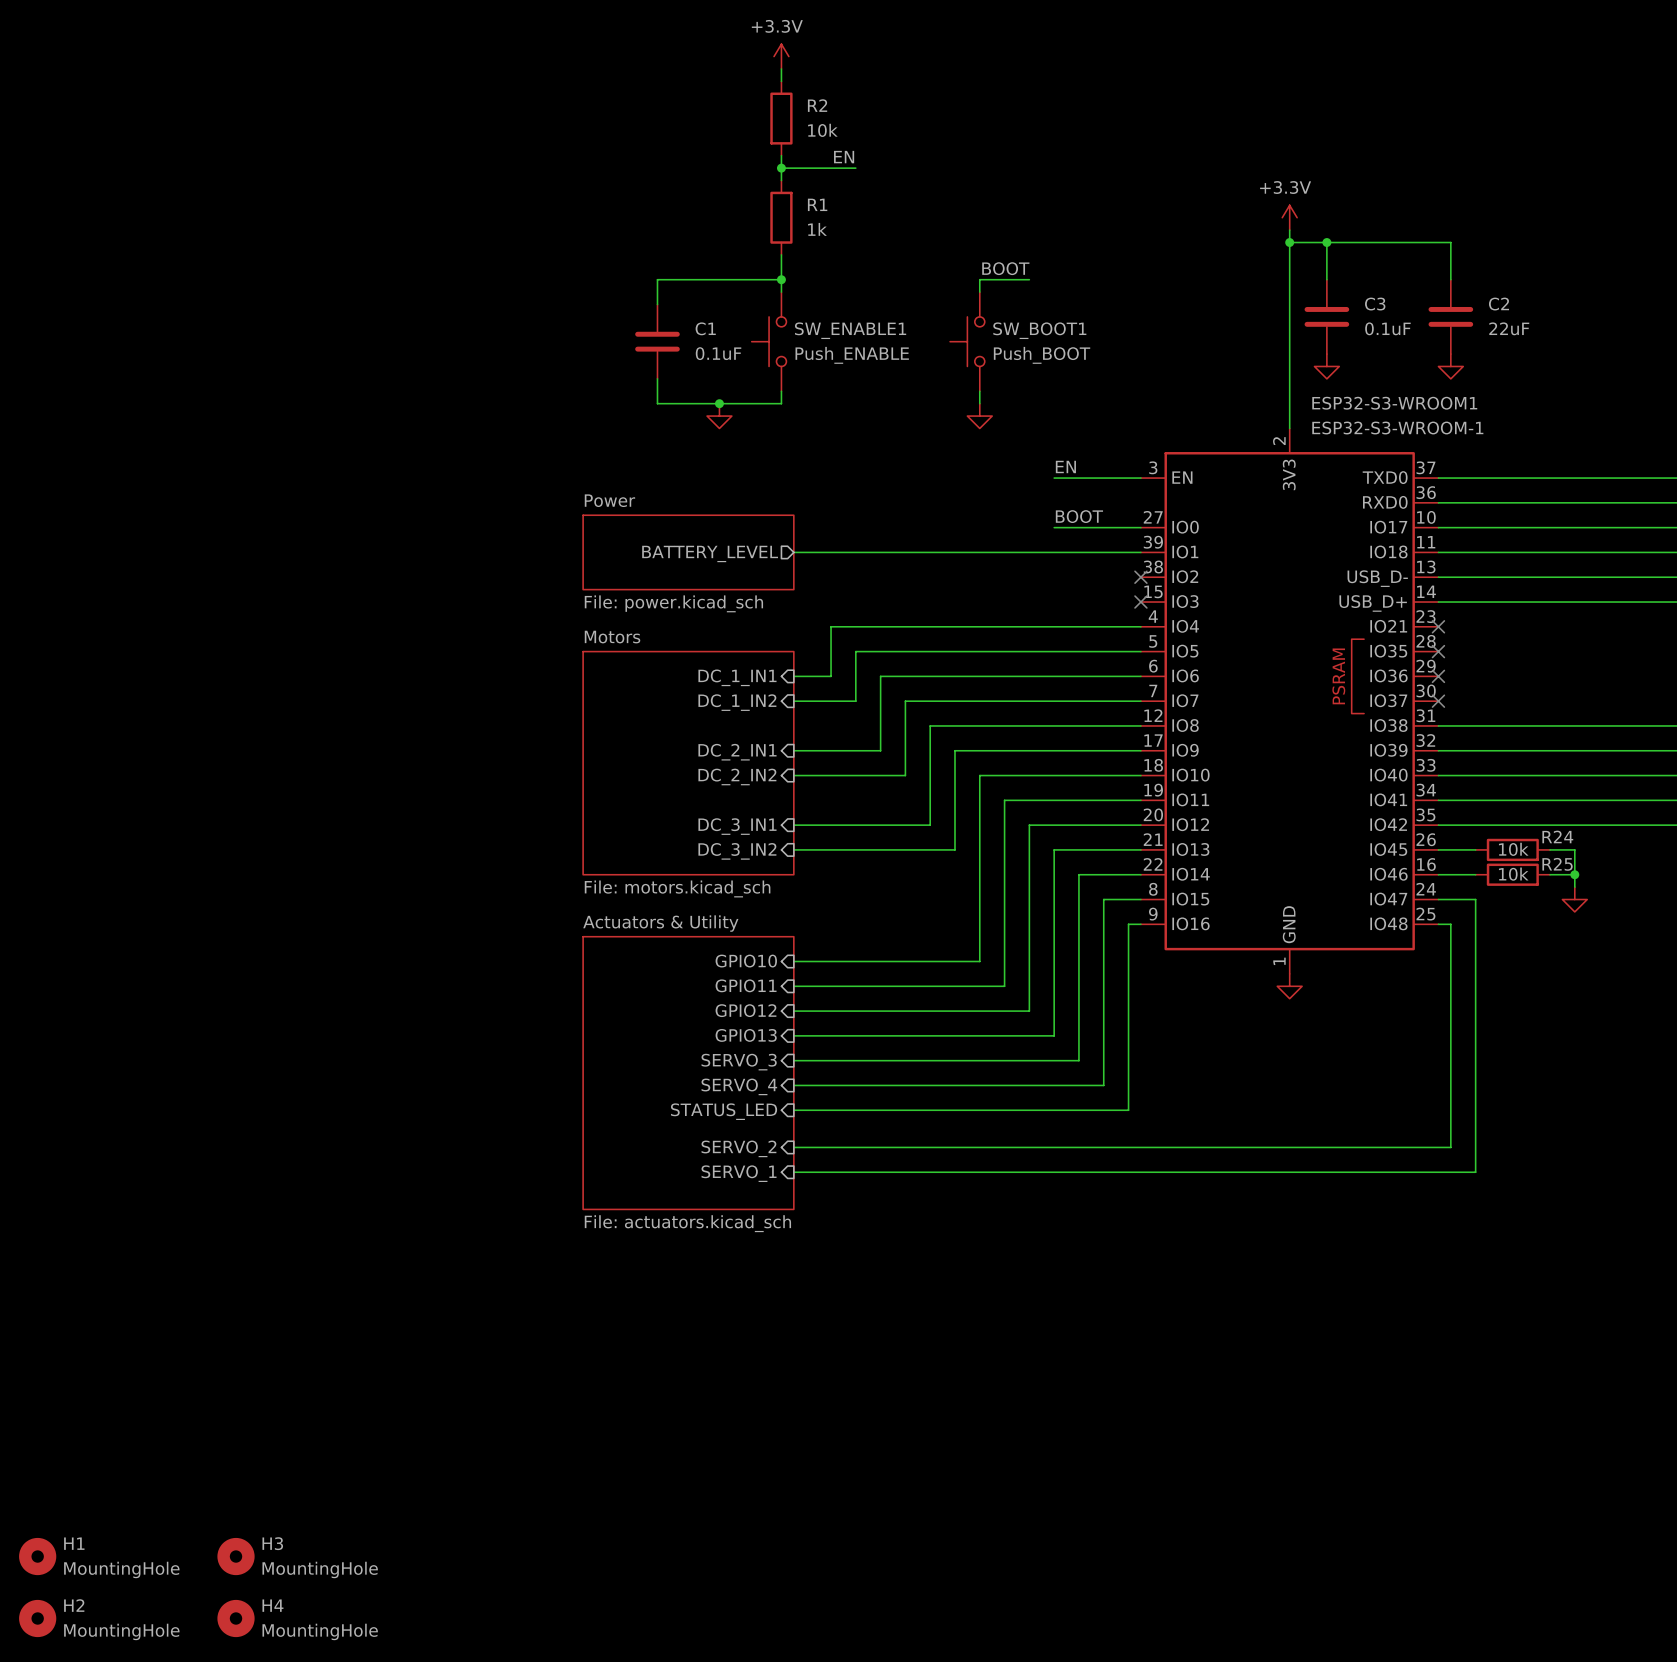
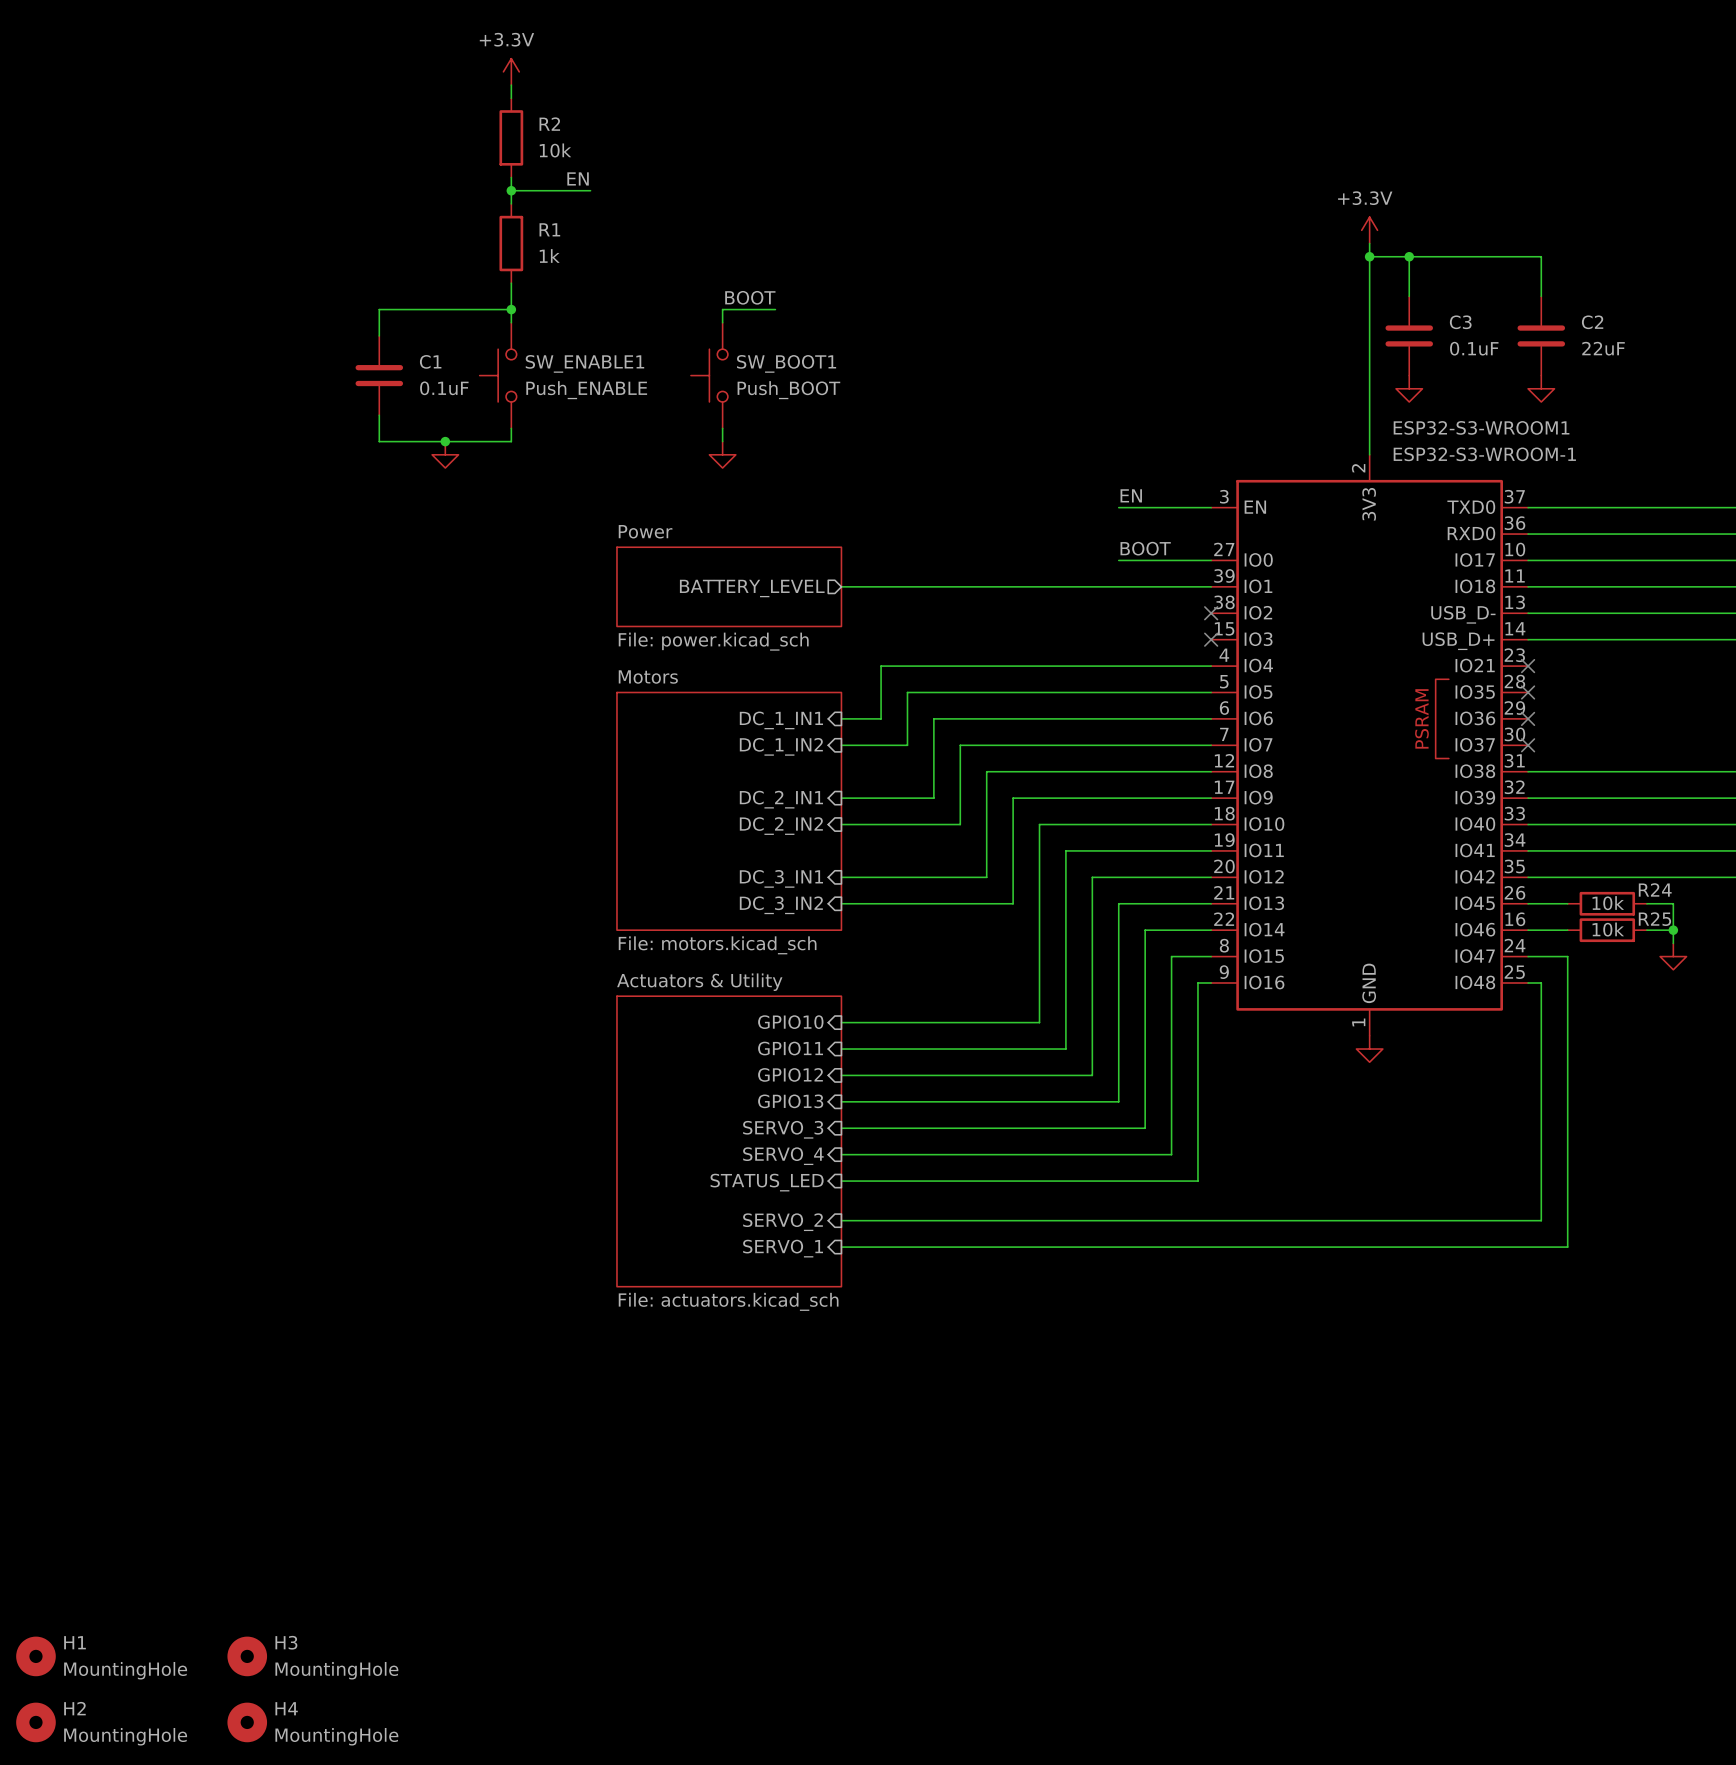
power symbol: +3.3V (781, 56) -> none
power symbol: none -> +3.3V (511, 71)
wire: (781, 68) (781, 81) -> none
wire: none -> (511, 85) (511, 98)
R2 position: (781, 118) -> (511, 137)
wire: (781, 155) (781, 180) -> none
label: EN (844, 157) -> none
wire: none -> (511, 177) (511, 203)
wire: (781, 168) (855, 168) -> none
junction: (781, 168) -> none
label: none -> EN (578, 178)
wire: none -> (511, 190) (590, 190)
junction: none -> (511, 190)
R1 position: (781, 217) -> (511, 243)
wire: (781, 254) (781, 292) -> none
wire: none -> (511, 283) (511, 322)
label: BOOT (1005, 268) -> none
wire: (781, 279) (657, 279) (657, 304) -> none
junction: (781, 279) -> none
wire: (1029, 279) (979, 279) (979, 292) -> none
label: none -> BOOT (750, 297)
wire: none -> (511, 309) (379, 309) (379, 335)
junction: none -> (511, 309)
wire: none -> (775, 309) (722, 309) (722, 322)
C1 position: (657, 341) -> (379, 375)
SW_ENABLE1 position: (769, 341) -> (498, 375)
SW_BOOT1 position: (967, 341) -> (709, 375)
wire: (657, 378) (657, 403) (781, 403) (781, 391) -> none
wire: none -> (379, 415) (379, 441) (511, 441) (511, 428)
wire: (979, 391) (979, 403) -> none
wire: none -> (722, 428) (722, 441)
junction: (719, 403) -> none
junction: none -> (445, 441)
power symbol position: (719, 416) -> (722, 454)
power symbol: (979, 416) -> none
power symbol: none -> (445, 454)

